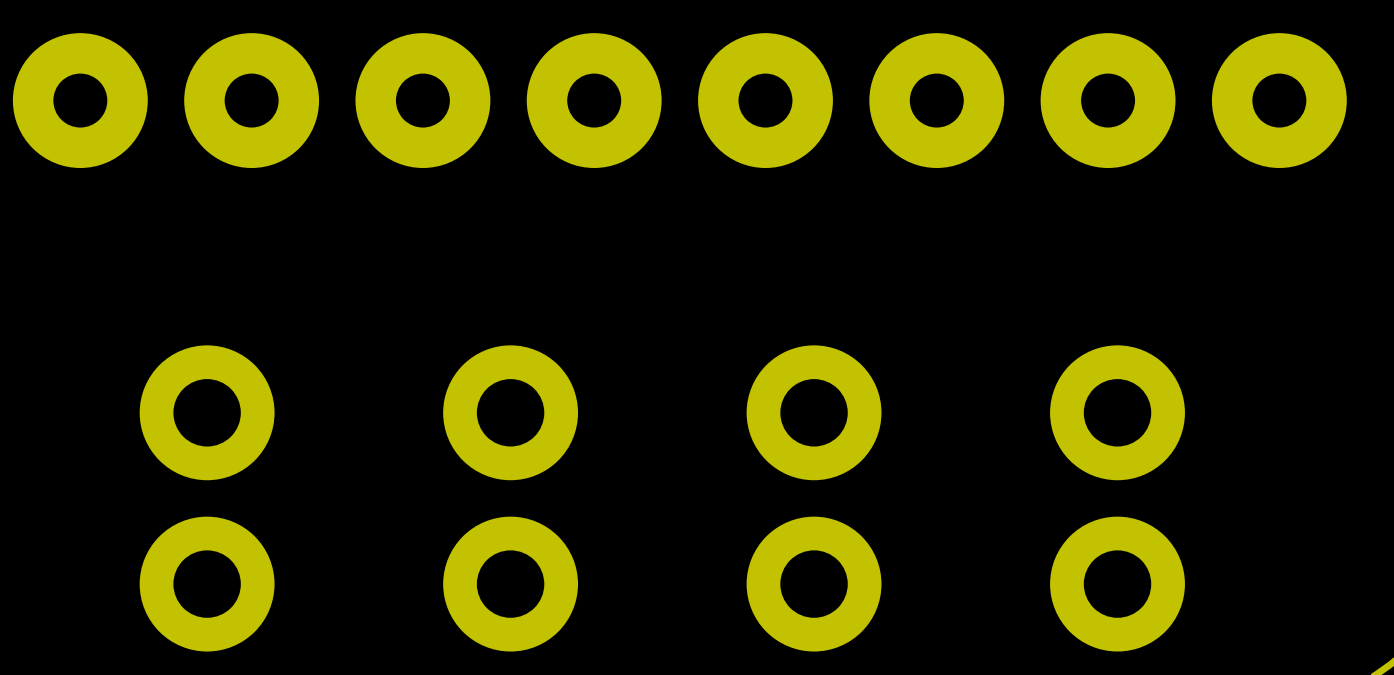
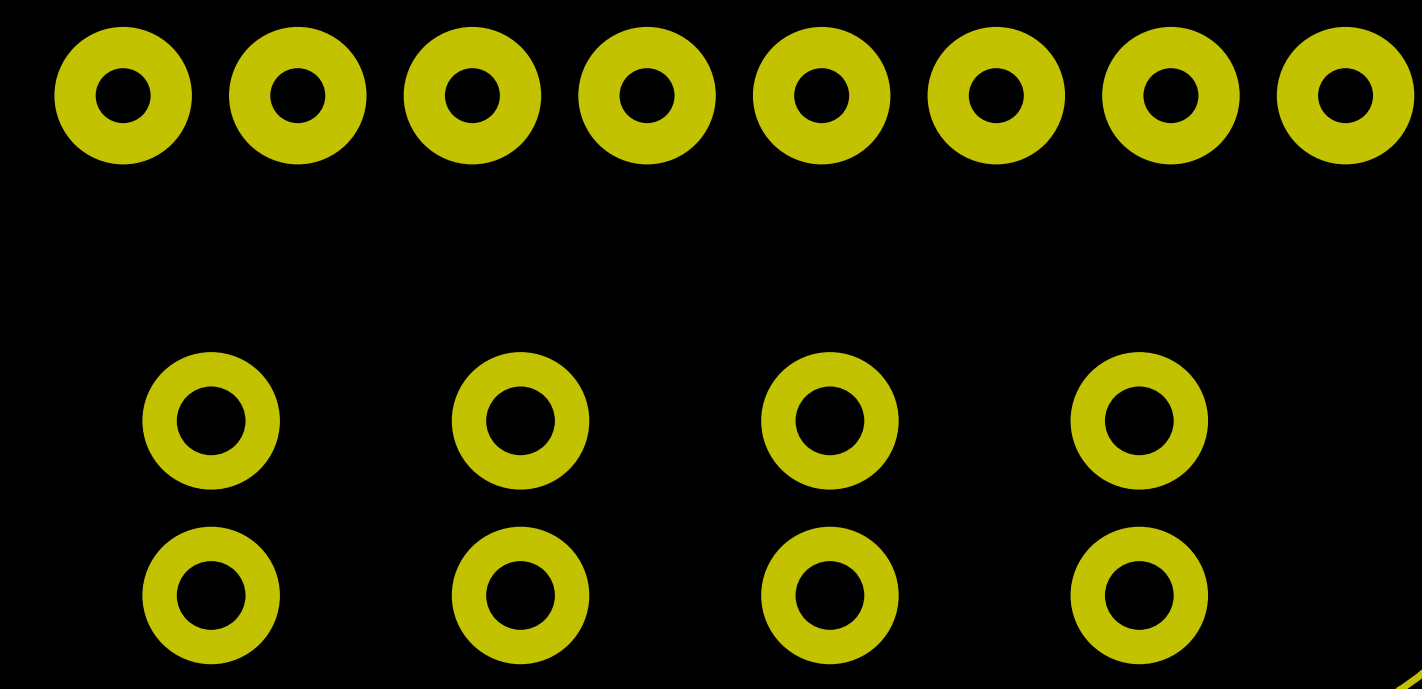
part position: (679, 100) -> (734, 95)

